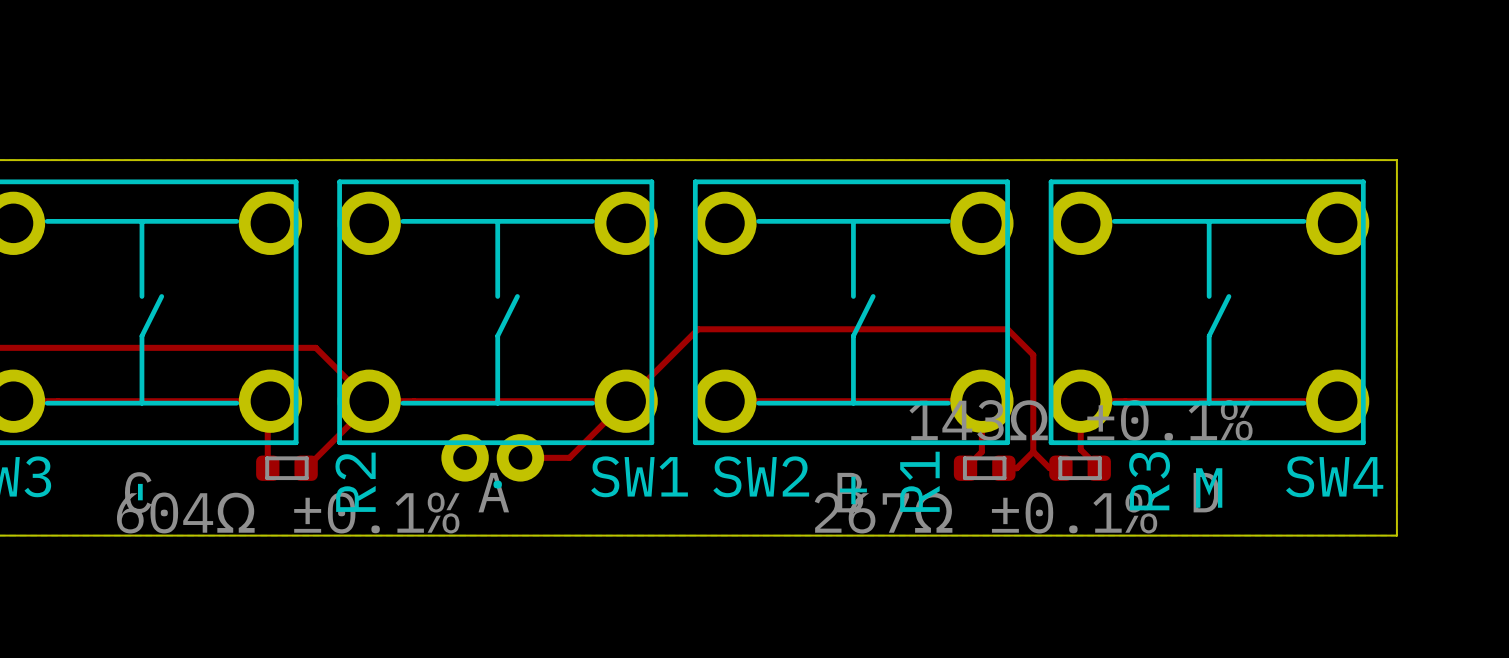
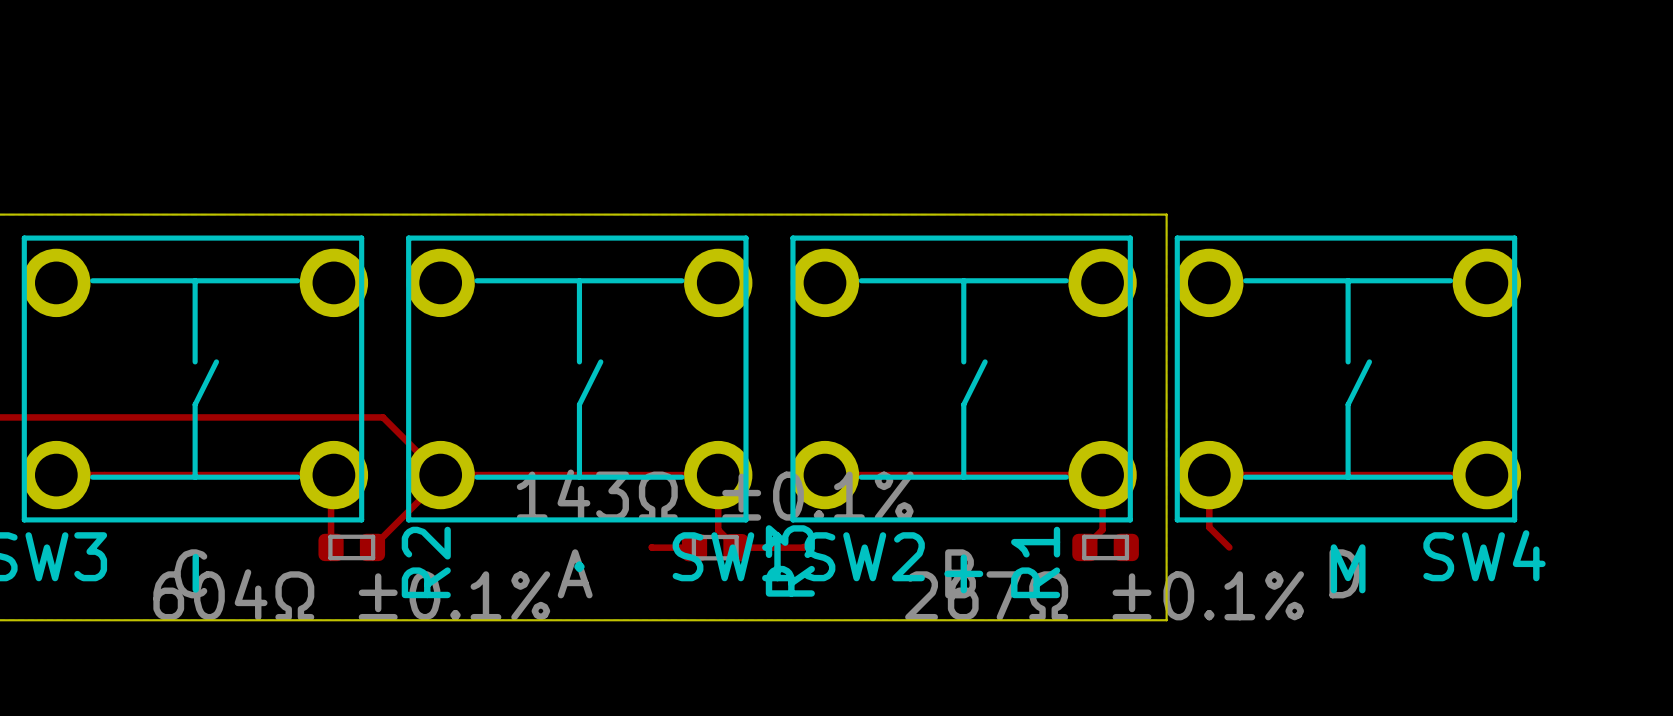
board edge: (1041, 160) (1396, 160) (1396, 535) (1041, 535) -> (1166, 214) (1166, 620)
top track: none -> (718, 475) (718, 529) (735, 547) (804, 546)
top track: (1033, 451) (1016, 468) (1003, 468) -> none
top track: (1033, 451) (1033, 354) (1007, 329) (698, 329) (569, 457) (520, 457) -> none
top track: (1033, 451) (1049, 468) (1060, 468) -> none
part: (492, 457) -> none
top track: none -> (652, 547) (694, 547)
R3 position: (1080, 468) -> (715, 547)

